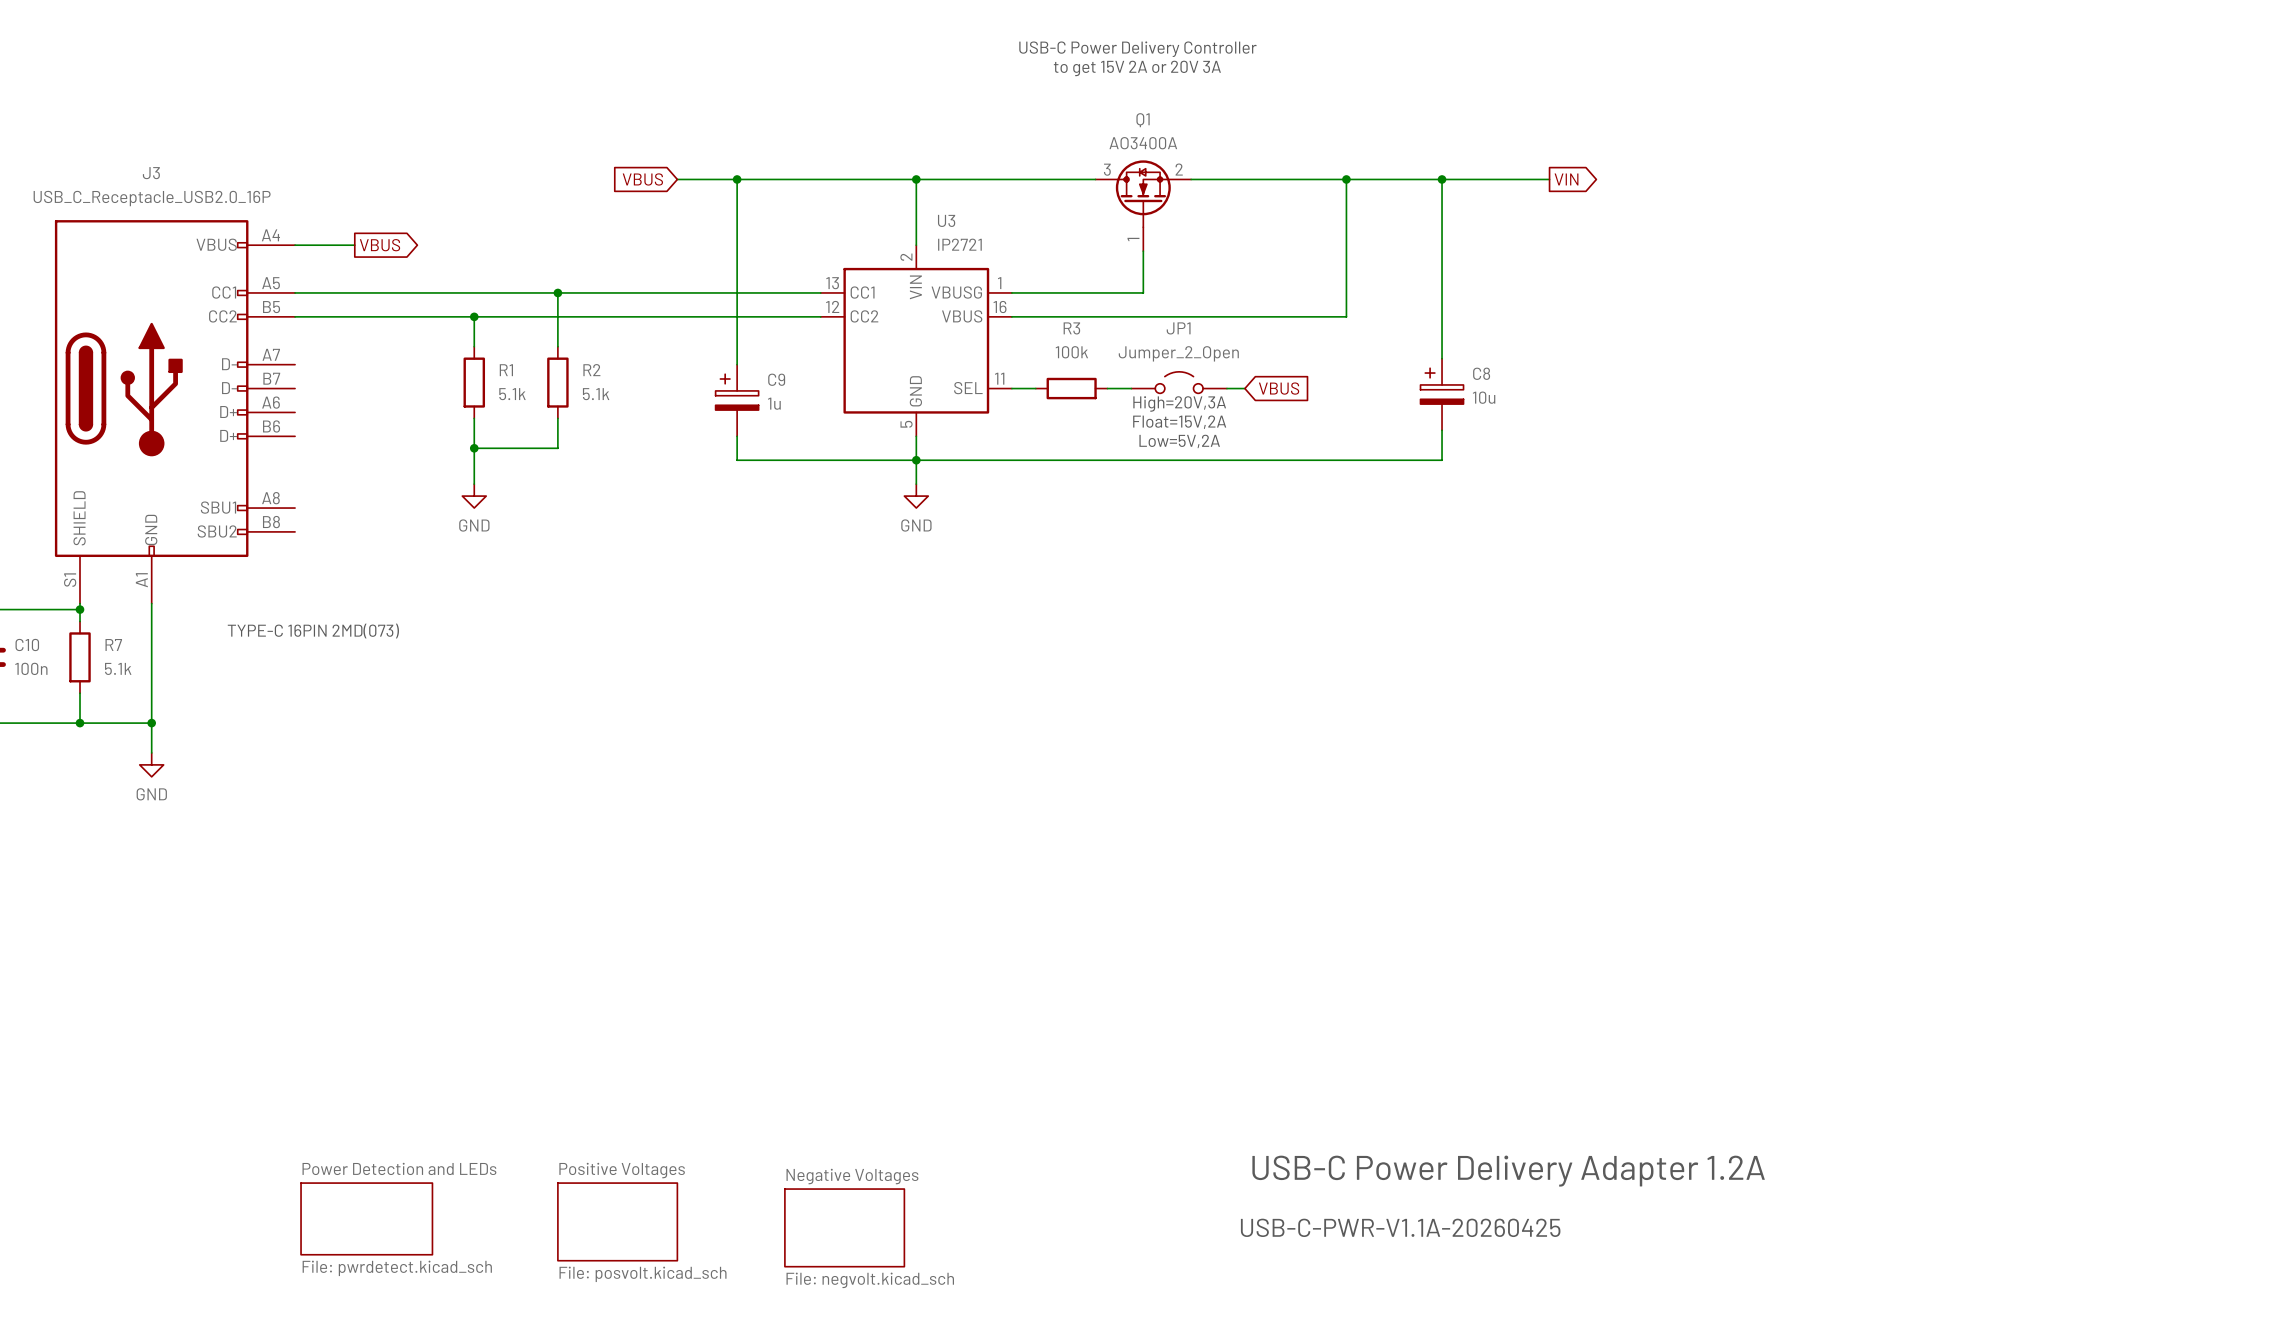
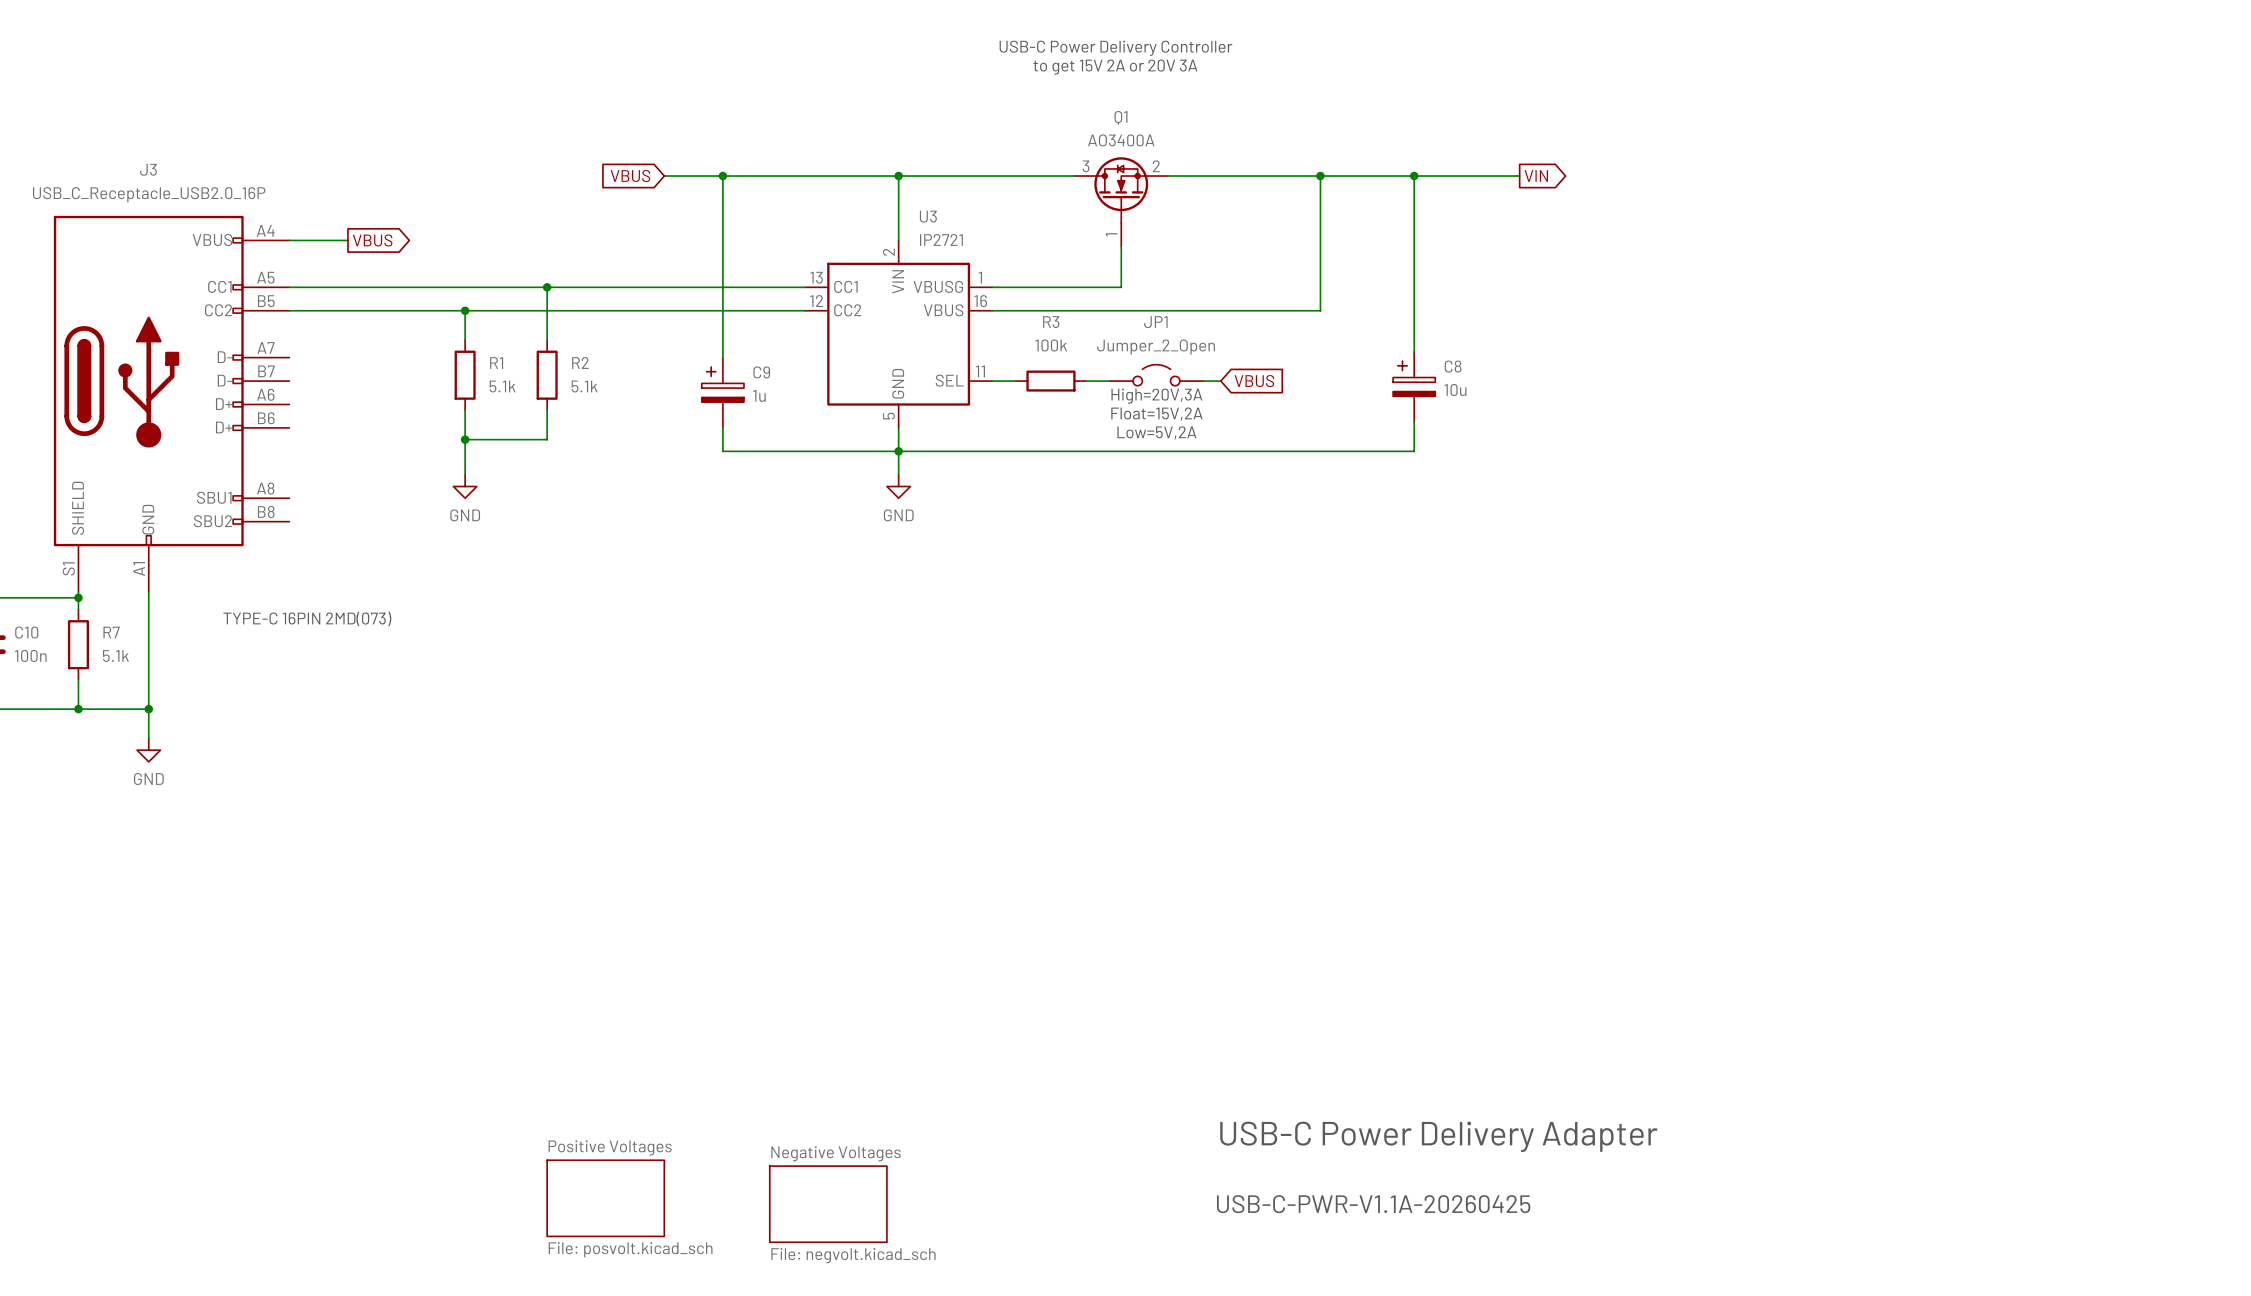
text: USB-C Power Delivery Adapter 1.2A (1508, 1171) -> USB-C Power Delivery Adapter (1438, 1136)
sheet Power Detection and LEDs: File: pwrdetect.kicad_sch (366, 1218) -> none

